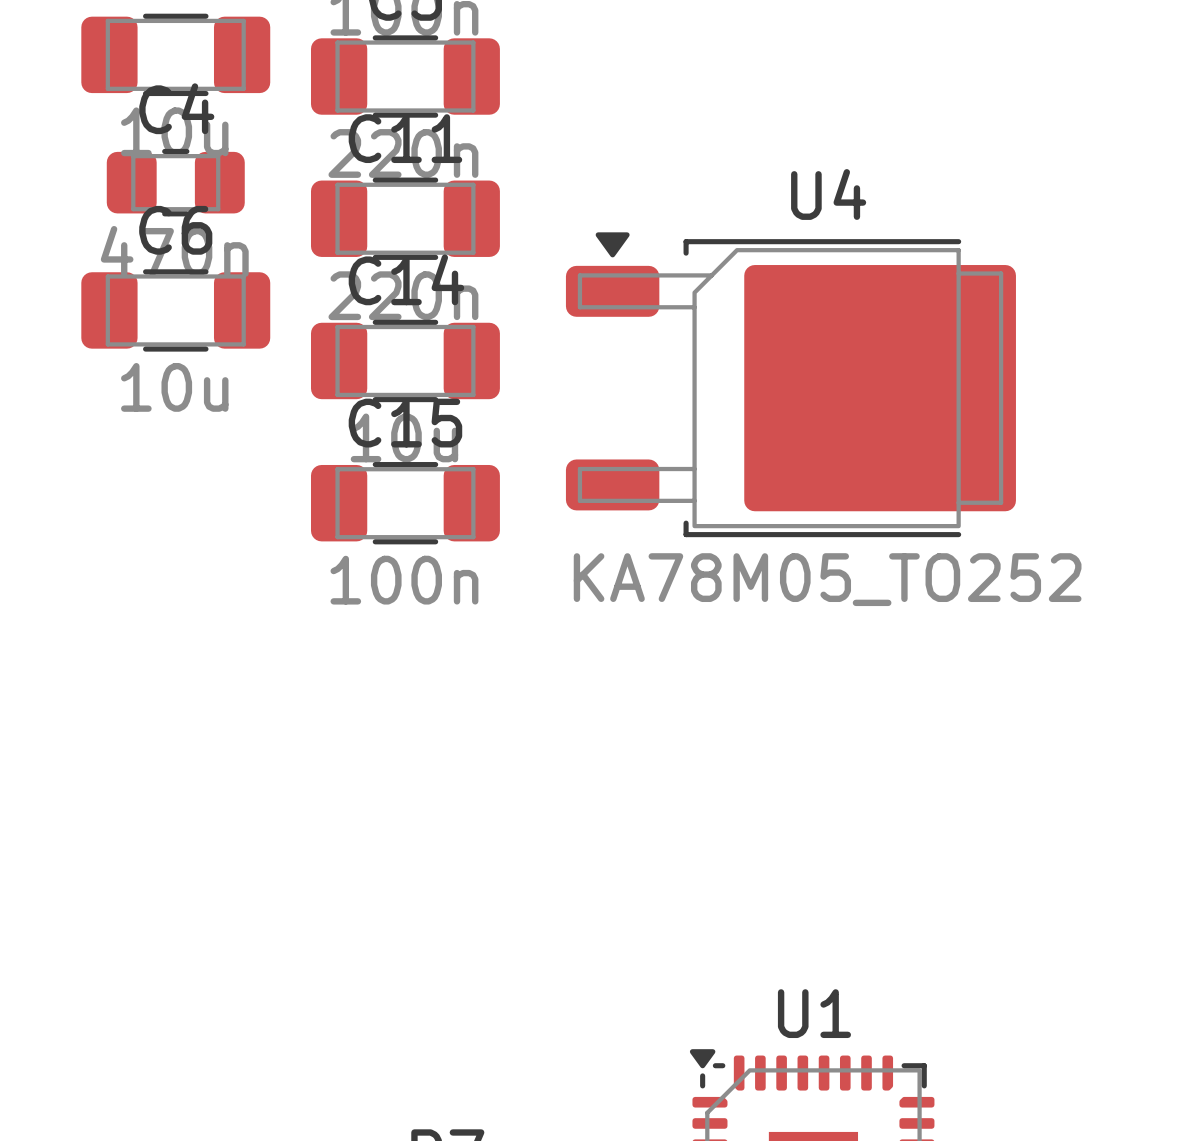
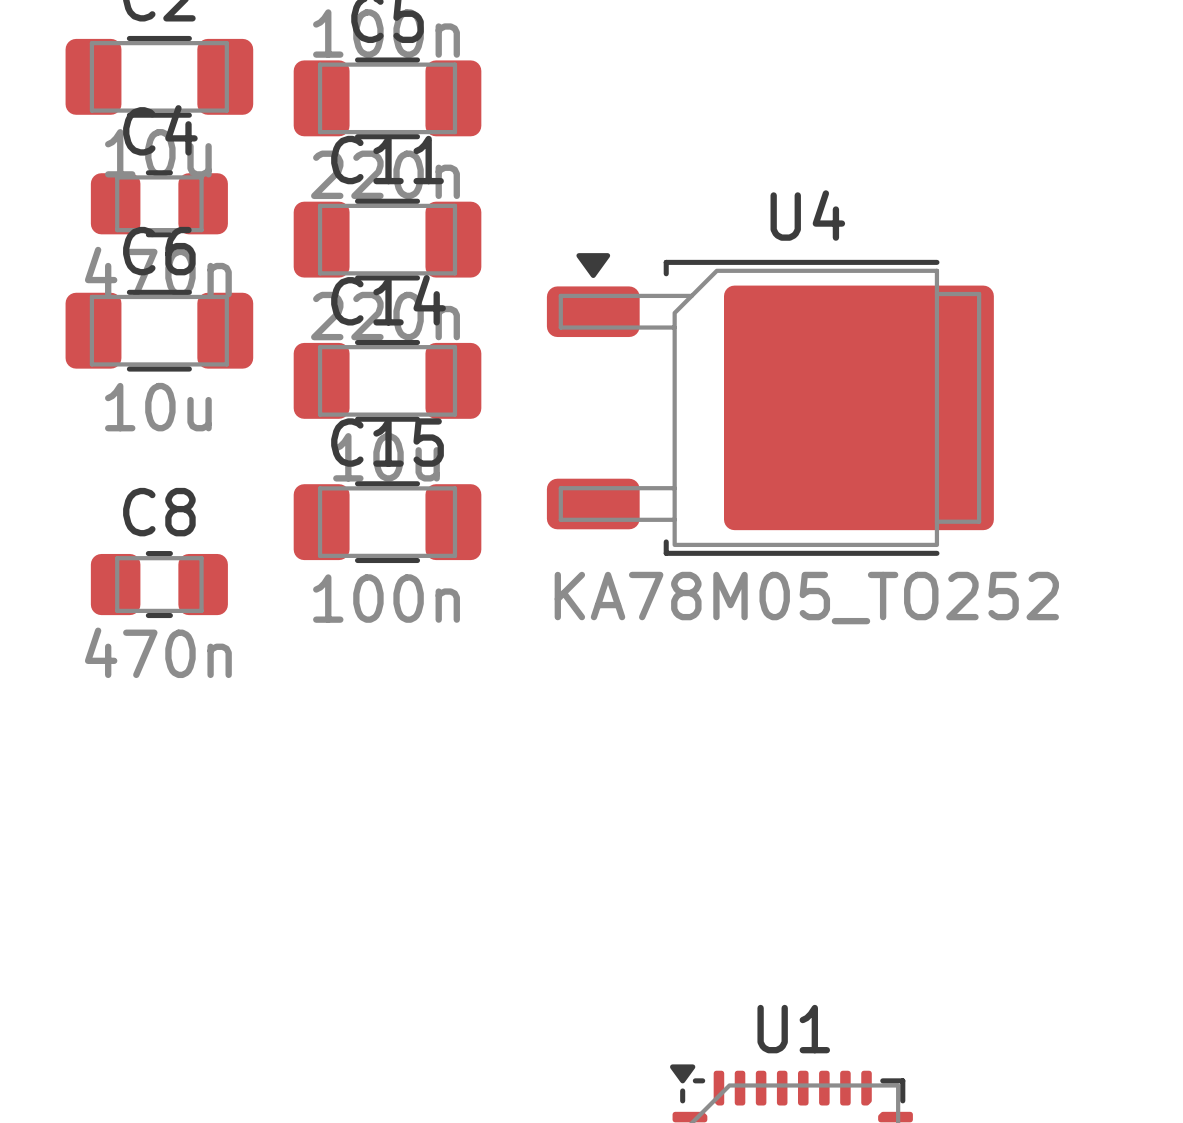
C8: none -> 470n (159, 584)

